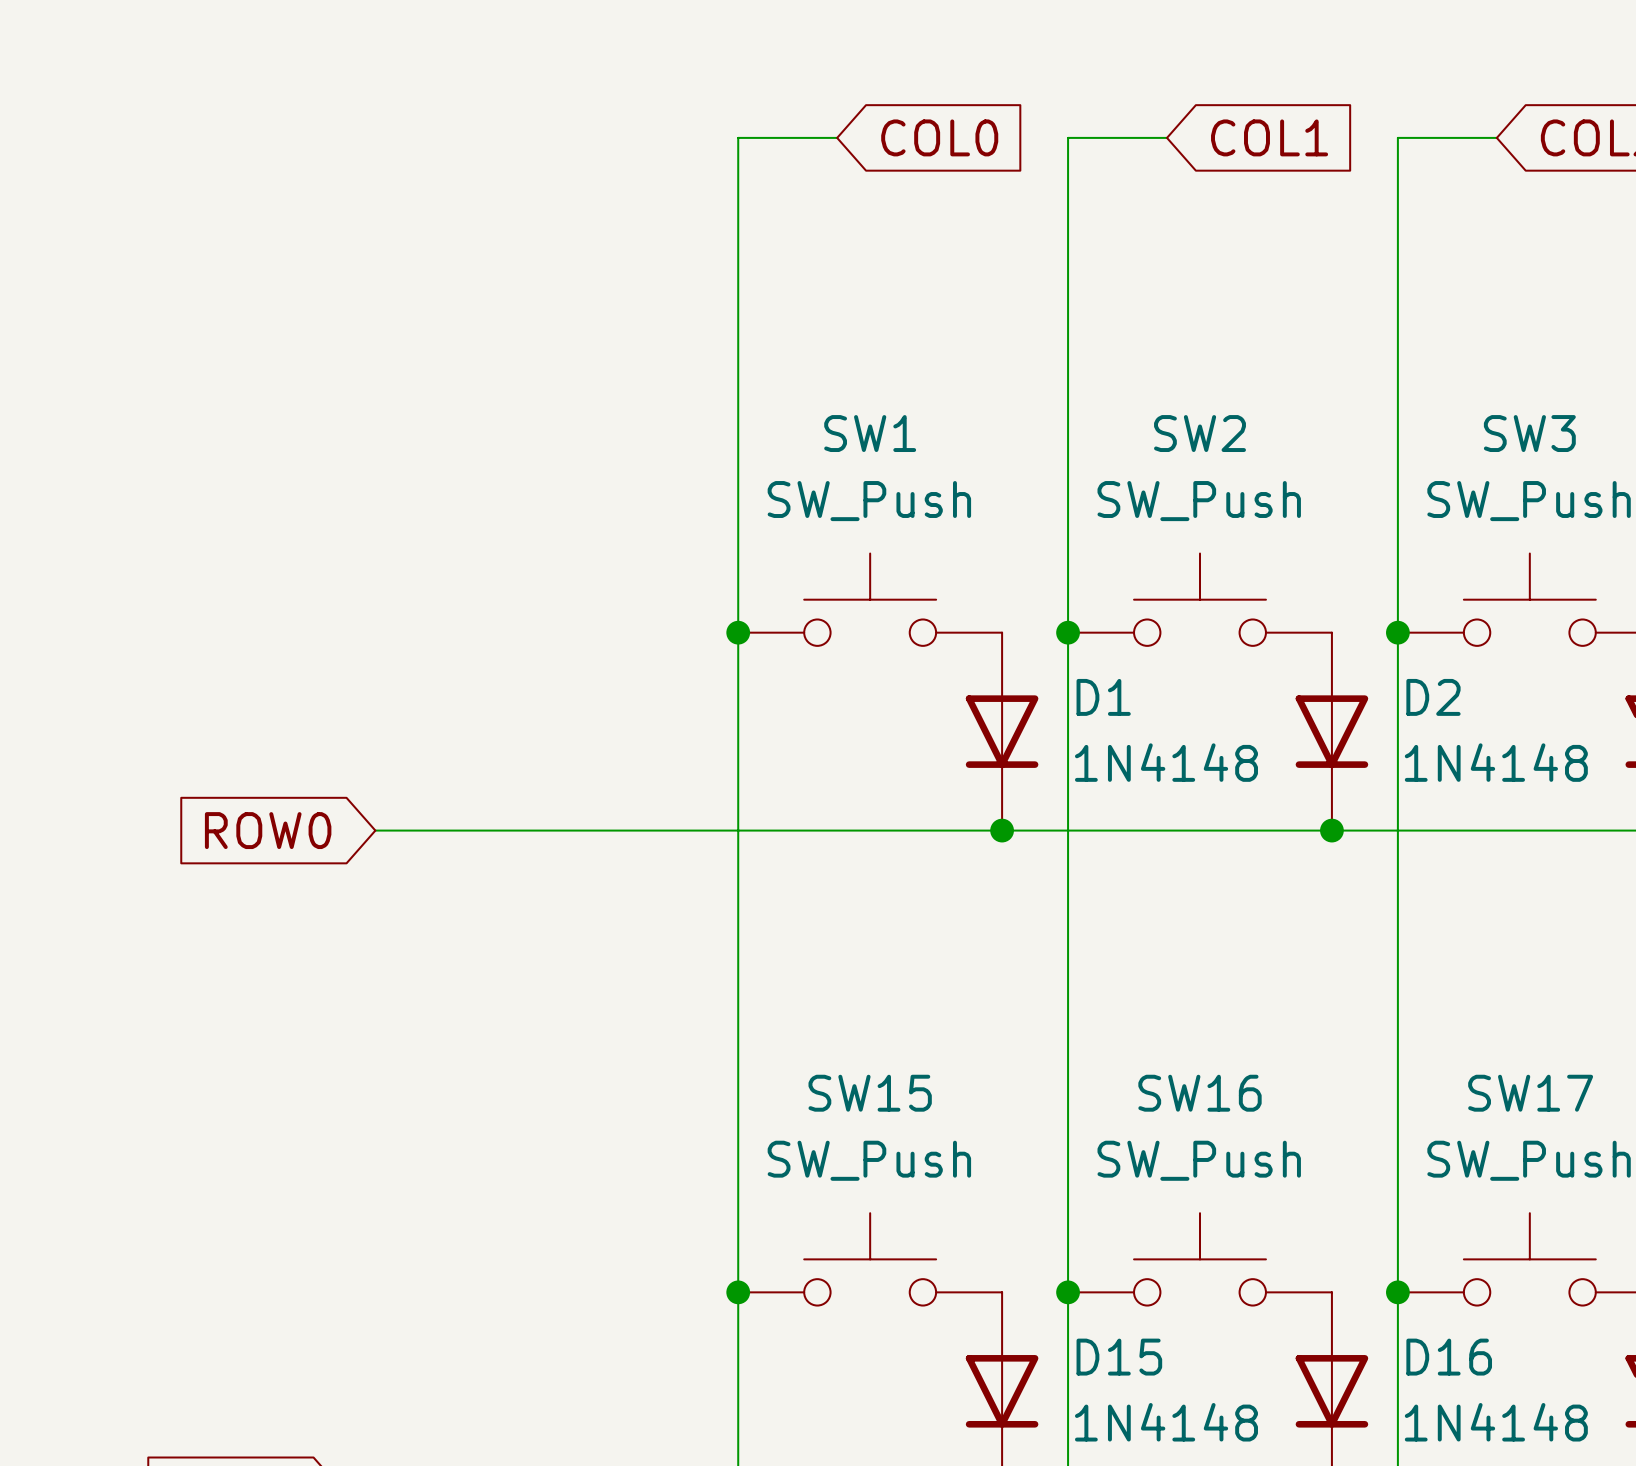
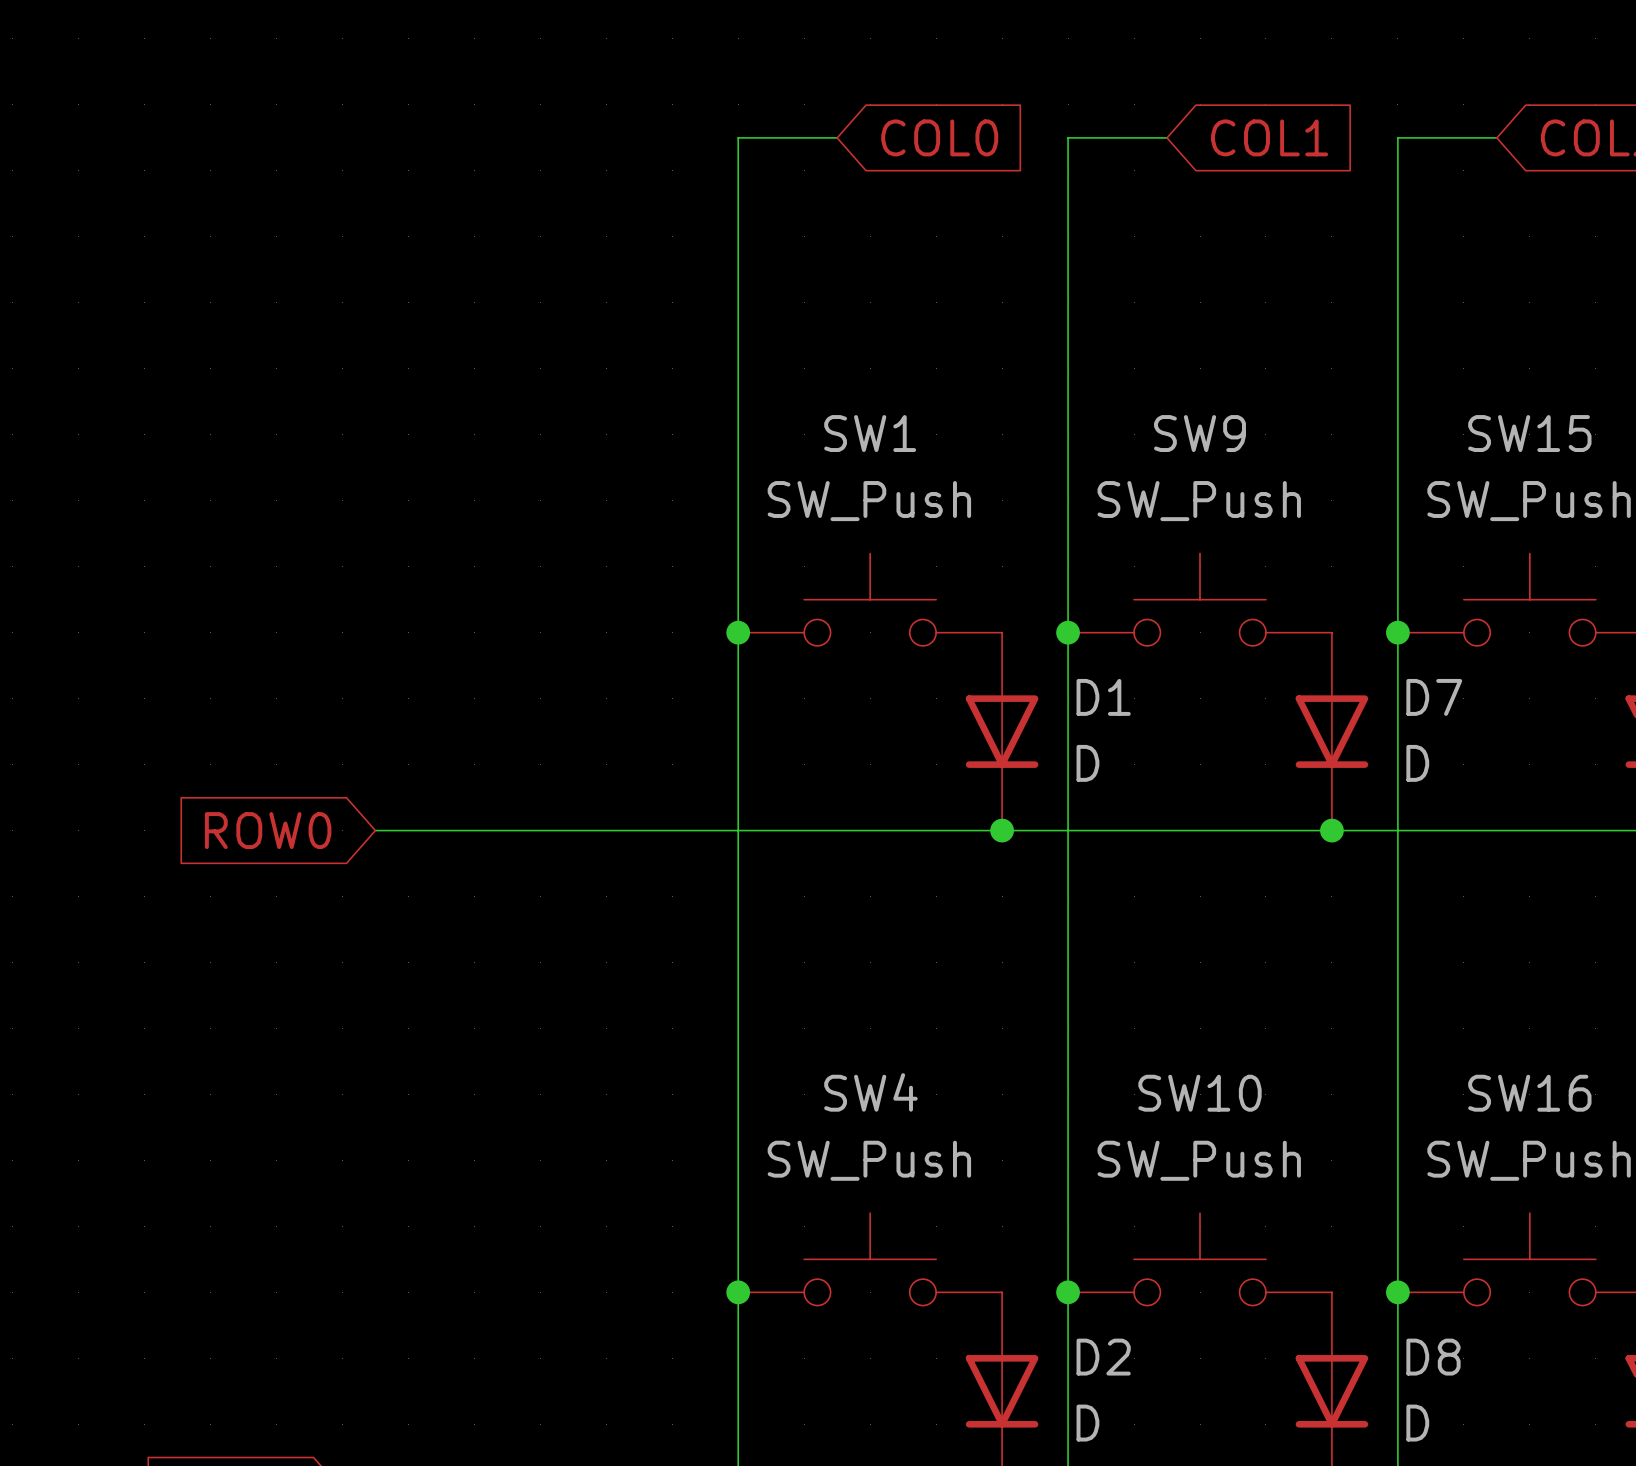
SW2 name: SW2 (1200, 433) -> SW9 (1200, 433)
SW3 name: SW3 (1529, 433) -> SW15 (1529, 433)
D2 name: D2 (1433, 697) -> D7 (1434, 697)
D1 value: 1N4148 (1166, 762) -> D (1087, 763)
D2 value: 1N4148 (1496, 762) -> D (1417, 763)
SW15 name: SW15 (870, 1093) -> SW4 (870, 1092)
SW16 name: SW16 (1200, 1093) -> SW10 (1200, 1093)
SW17 name: SW17 (1530, 1093) -> SW16 (1529, 1093)
D15 name: D15 (1119, 1357) -> D2 (1103, 1357)
D16 name: D16 (1449, 1357) -> D8 (1433, 1357)
D15 value: 1N4148 (1166, 1422) -> D (1087, 1423)
D16 value: 1N4148 (1496, 1422) -> D (1417, 1423)

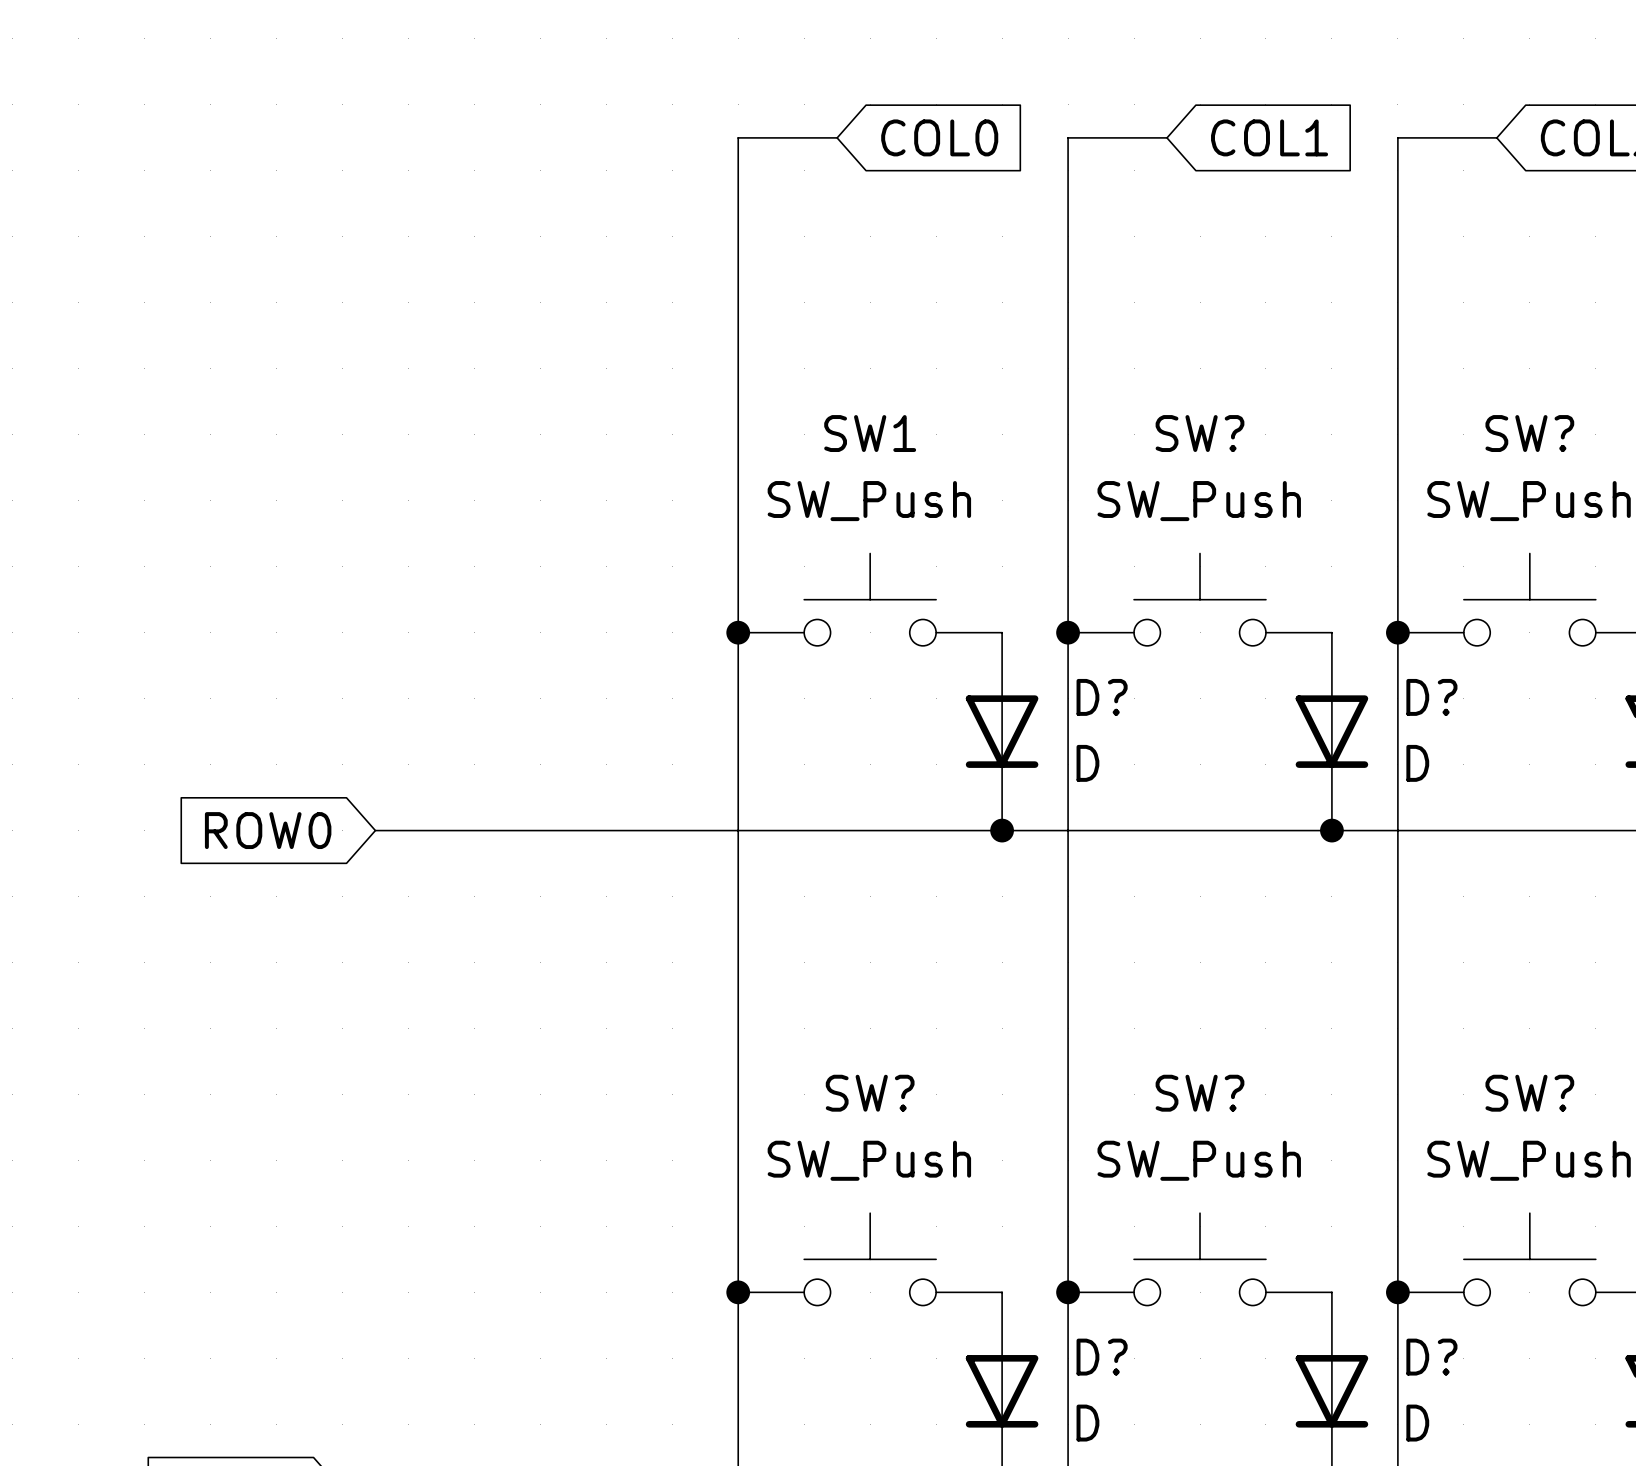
SW9 name: SW9 (1200, 433) -> SW? (1200, 433)
SW15 name: SW15 (1529, 433) -> SW? (1529, 433)
D1 name: D1 (1103, 697) -> D? (1102, 697)
D7 name: D7 (1434, 697) -> D? (1431, 697)
SW4 name: SW4 (870, 1092) -> SW? (870, 1093)
SW10 name: SW10 (1200, 1093) -> SW? (1200, 1093)
SW16 name: SW16 (1529, 1093) -> SW? (1529, 1093)
D2 name: D2 (1103, 1357) -> D? (1102, 1357)
D8 name: D8 (1433, 1357) -> D? (1431, 1357)

